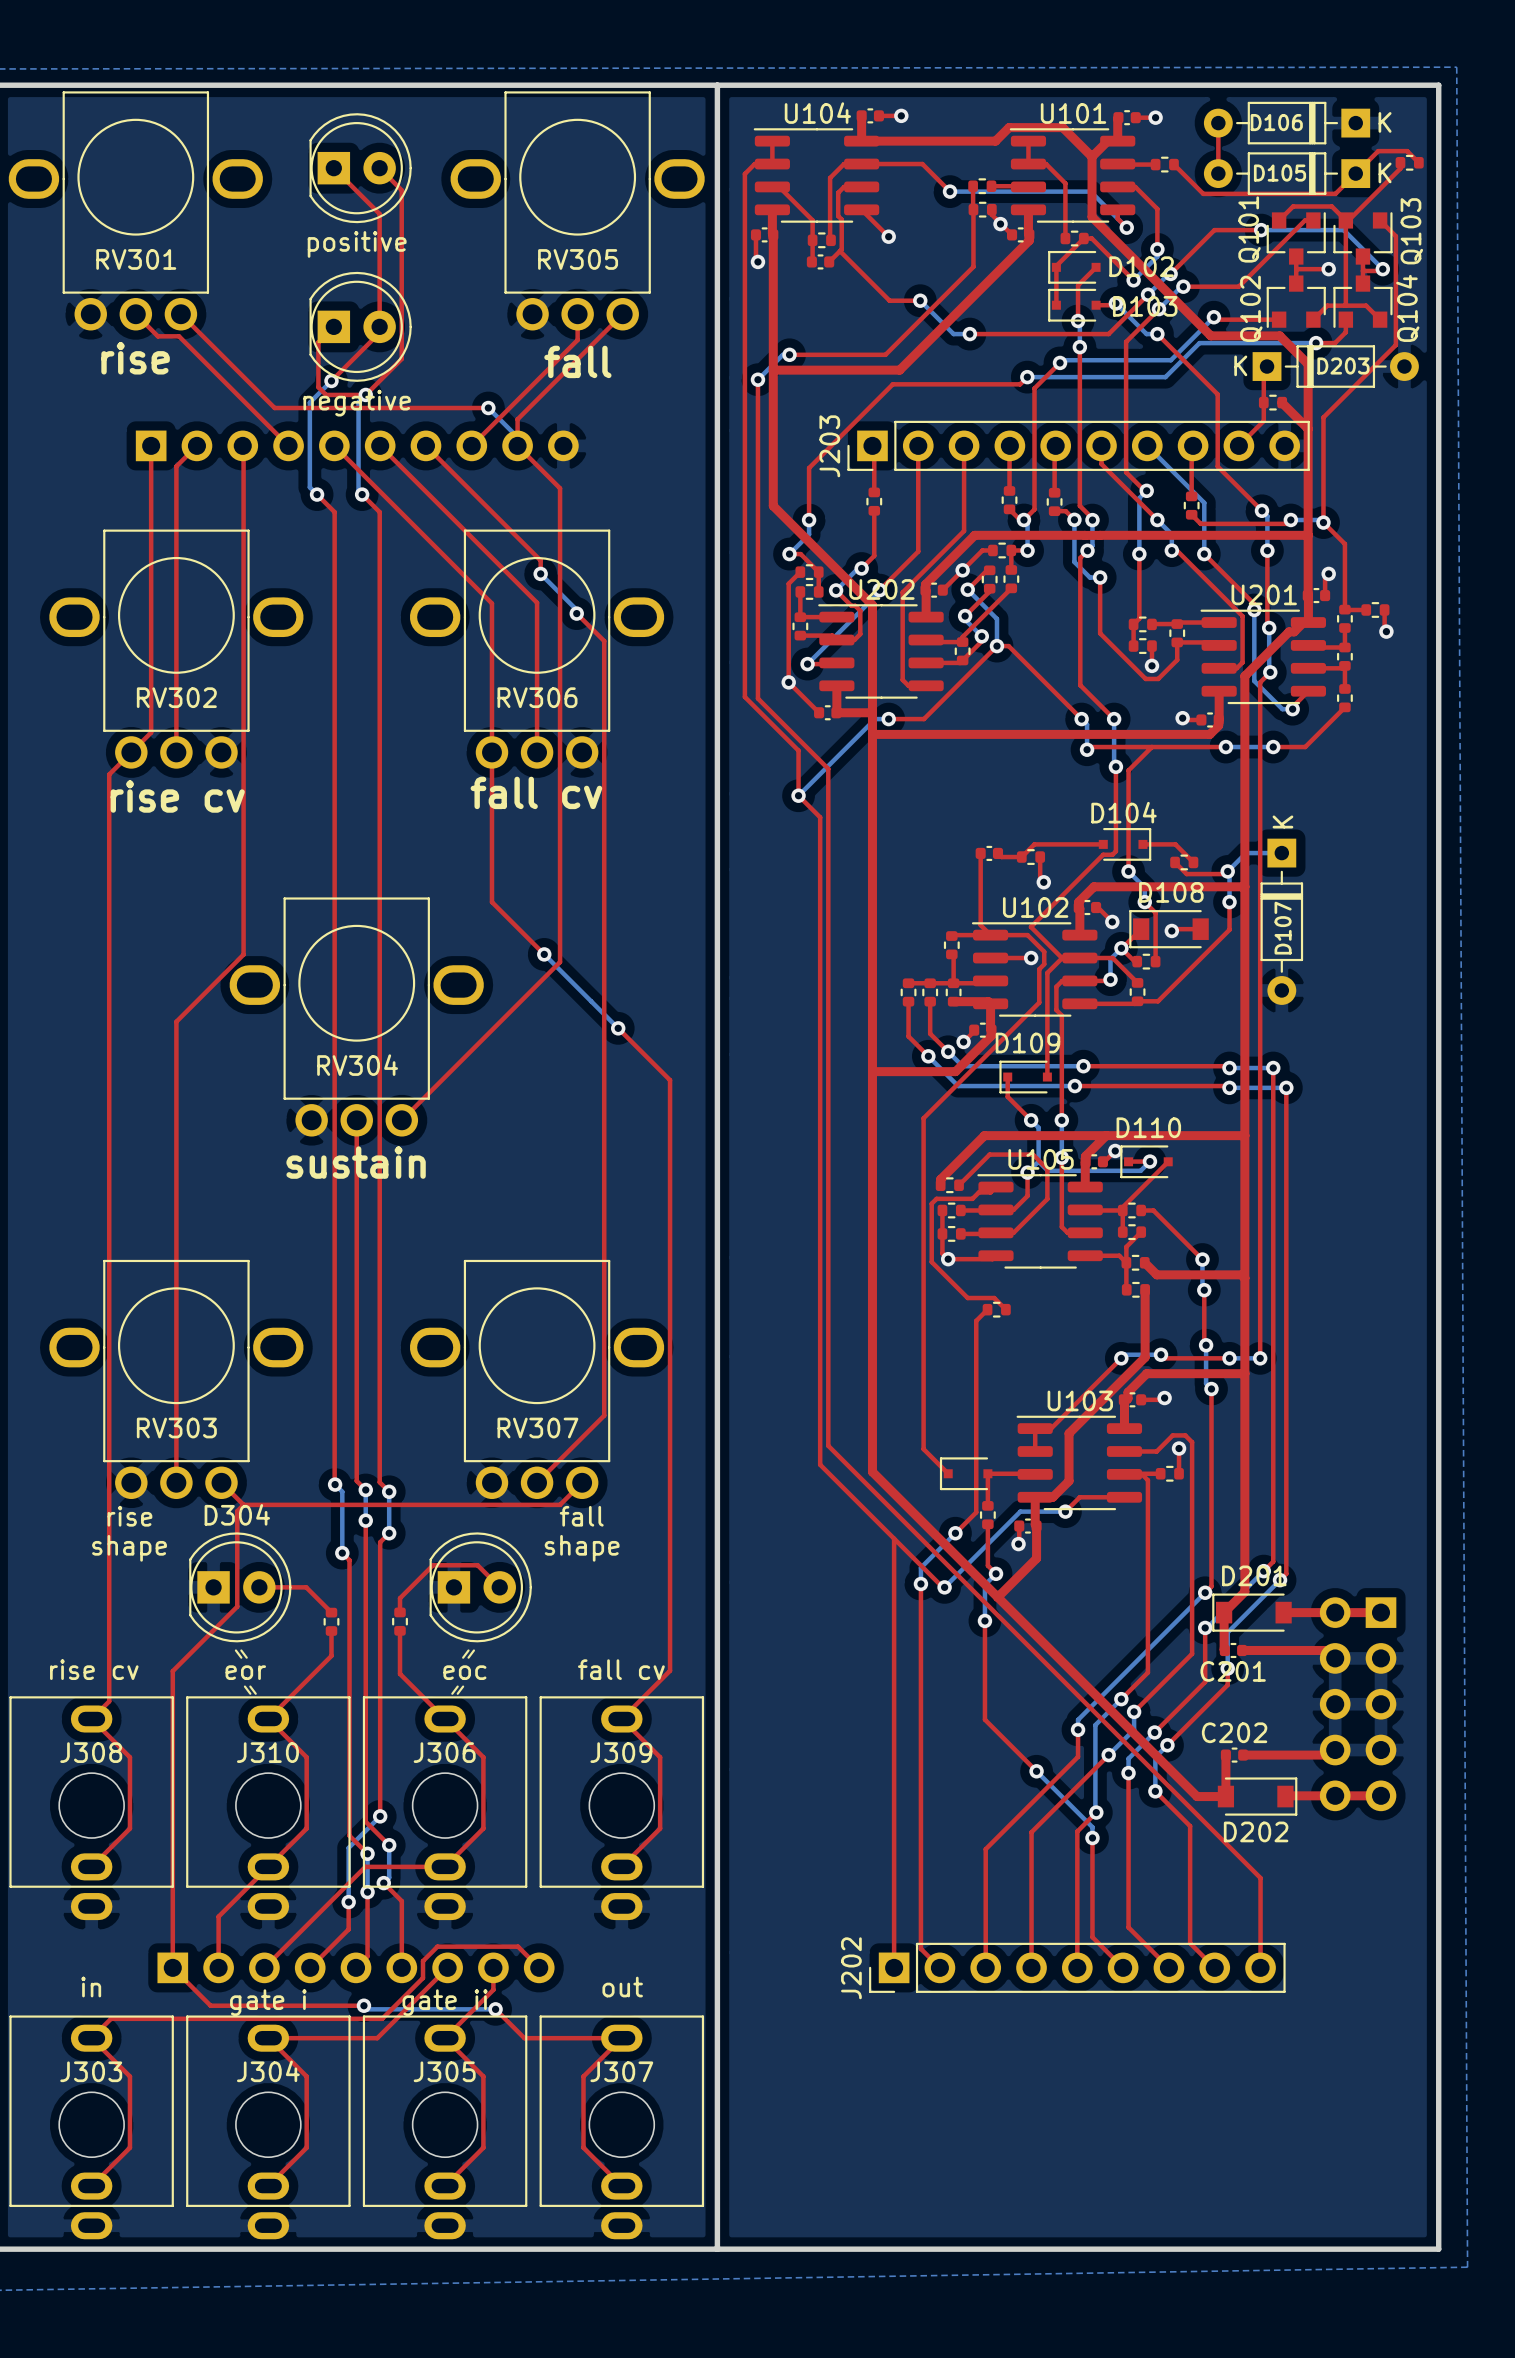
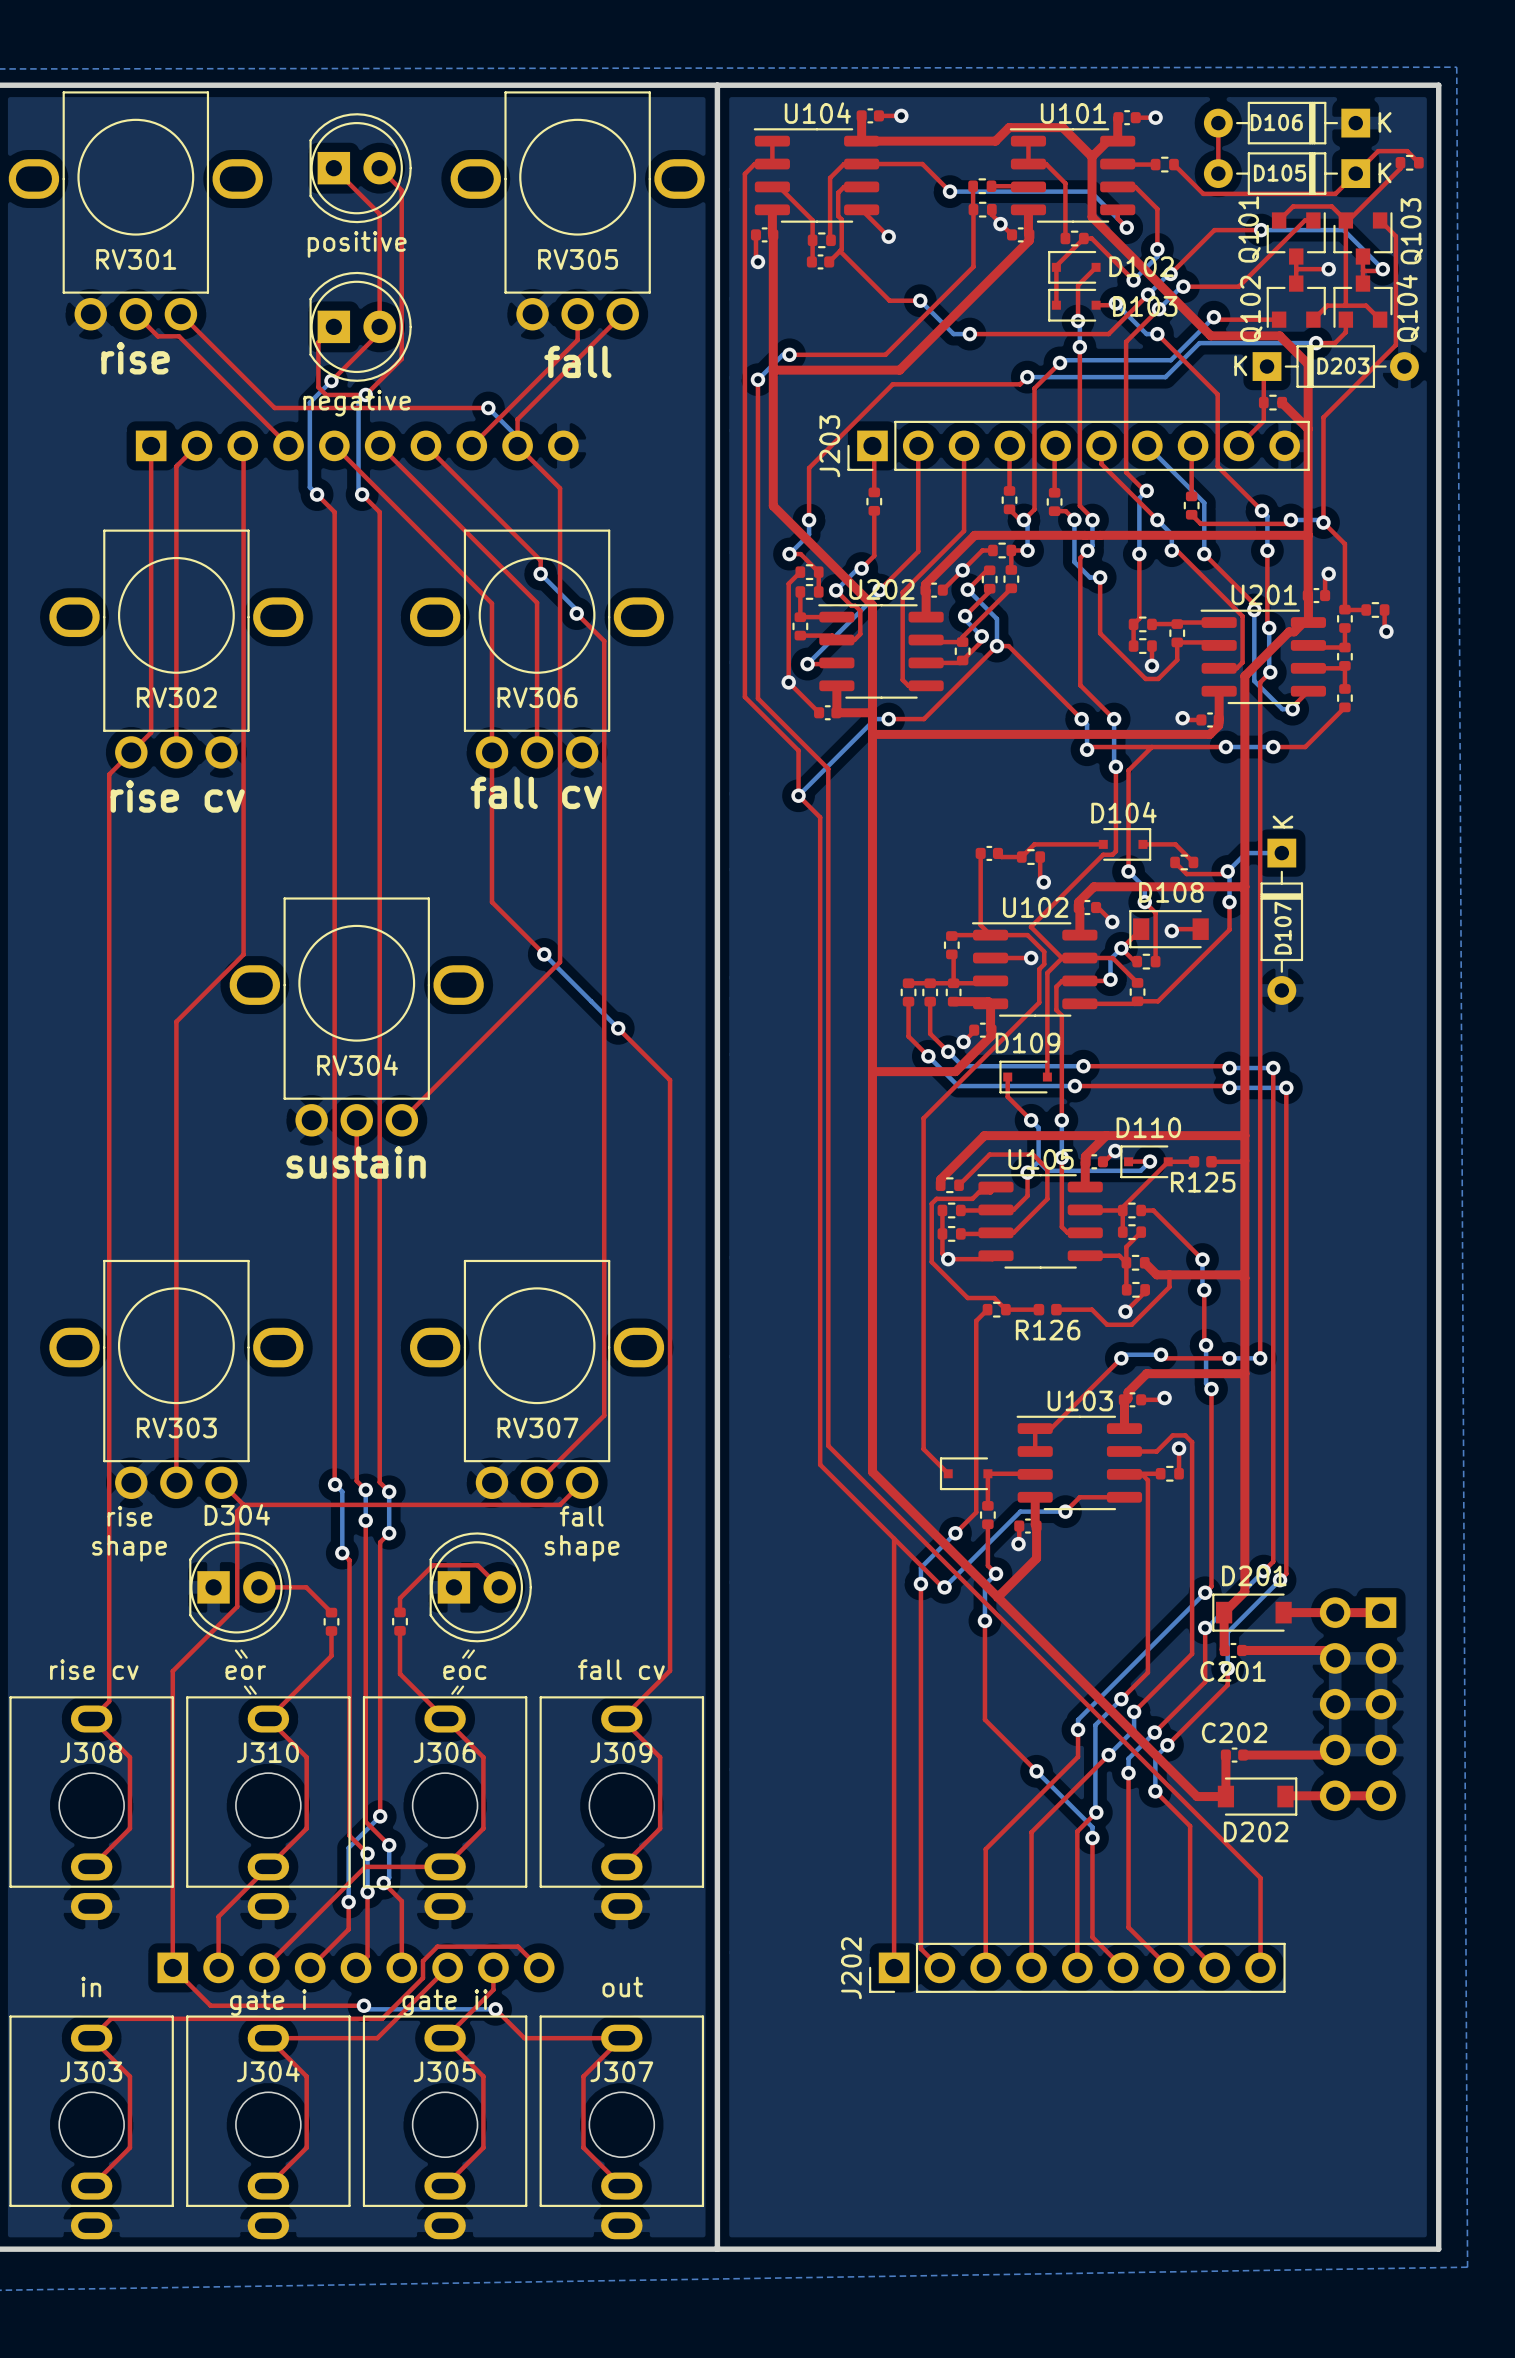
top track: none -> (1244, 1160) (1211, 1161)
top track: none -> (1168, 1161) (1194, 1161)
R125: none -> (1202, 1161)
top track: none -> (1169, 1274) (1169, 1287) (1131, 1324) (1107, 1324) (1091, 1309) (1056, 1309)
top track: (1145, 1292) (1145, 1357) (1069, 1433) (1069, 1481) (1052, 1497) (1035, 1497) -> (1145, 1292) (1125, 1311)
top track: none -> (1005, 1309) (1038, 1309)
R126: none -> (1047, 1309)
via: none -> (1125, 1311)

